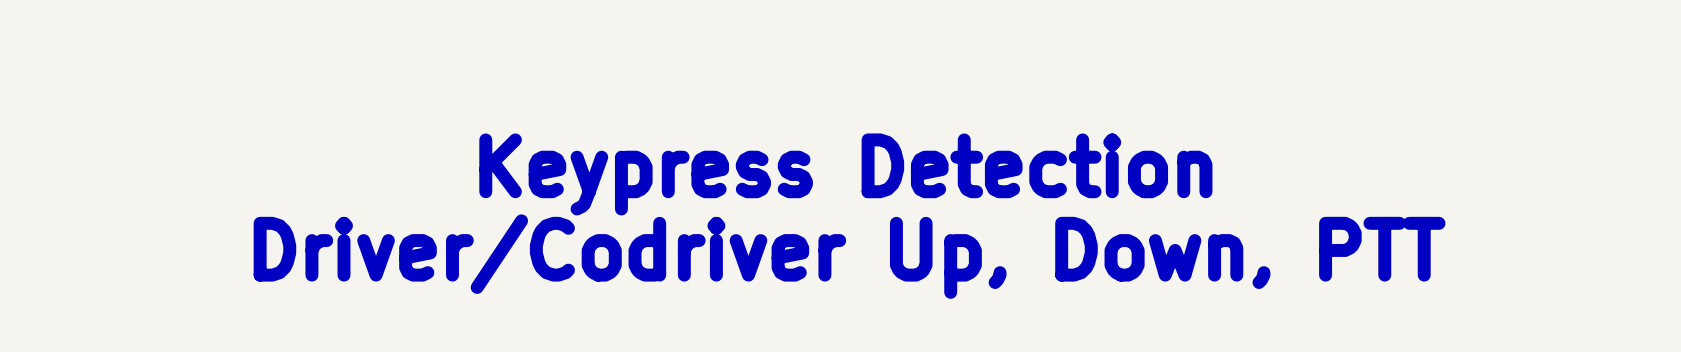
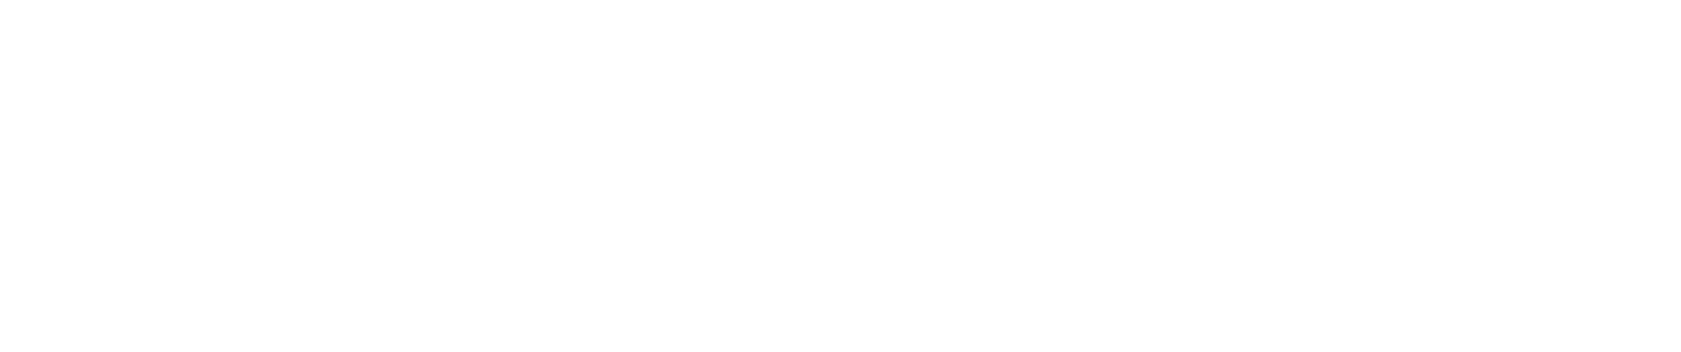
text: Keypress Detection (845, 174) -> none
text: Driver/Codriver Up, Down, PTT (849, 256) -> none

